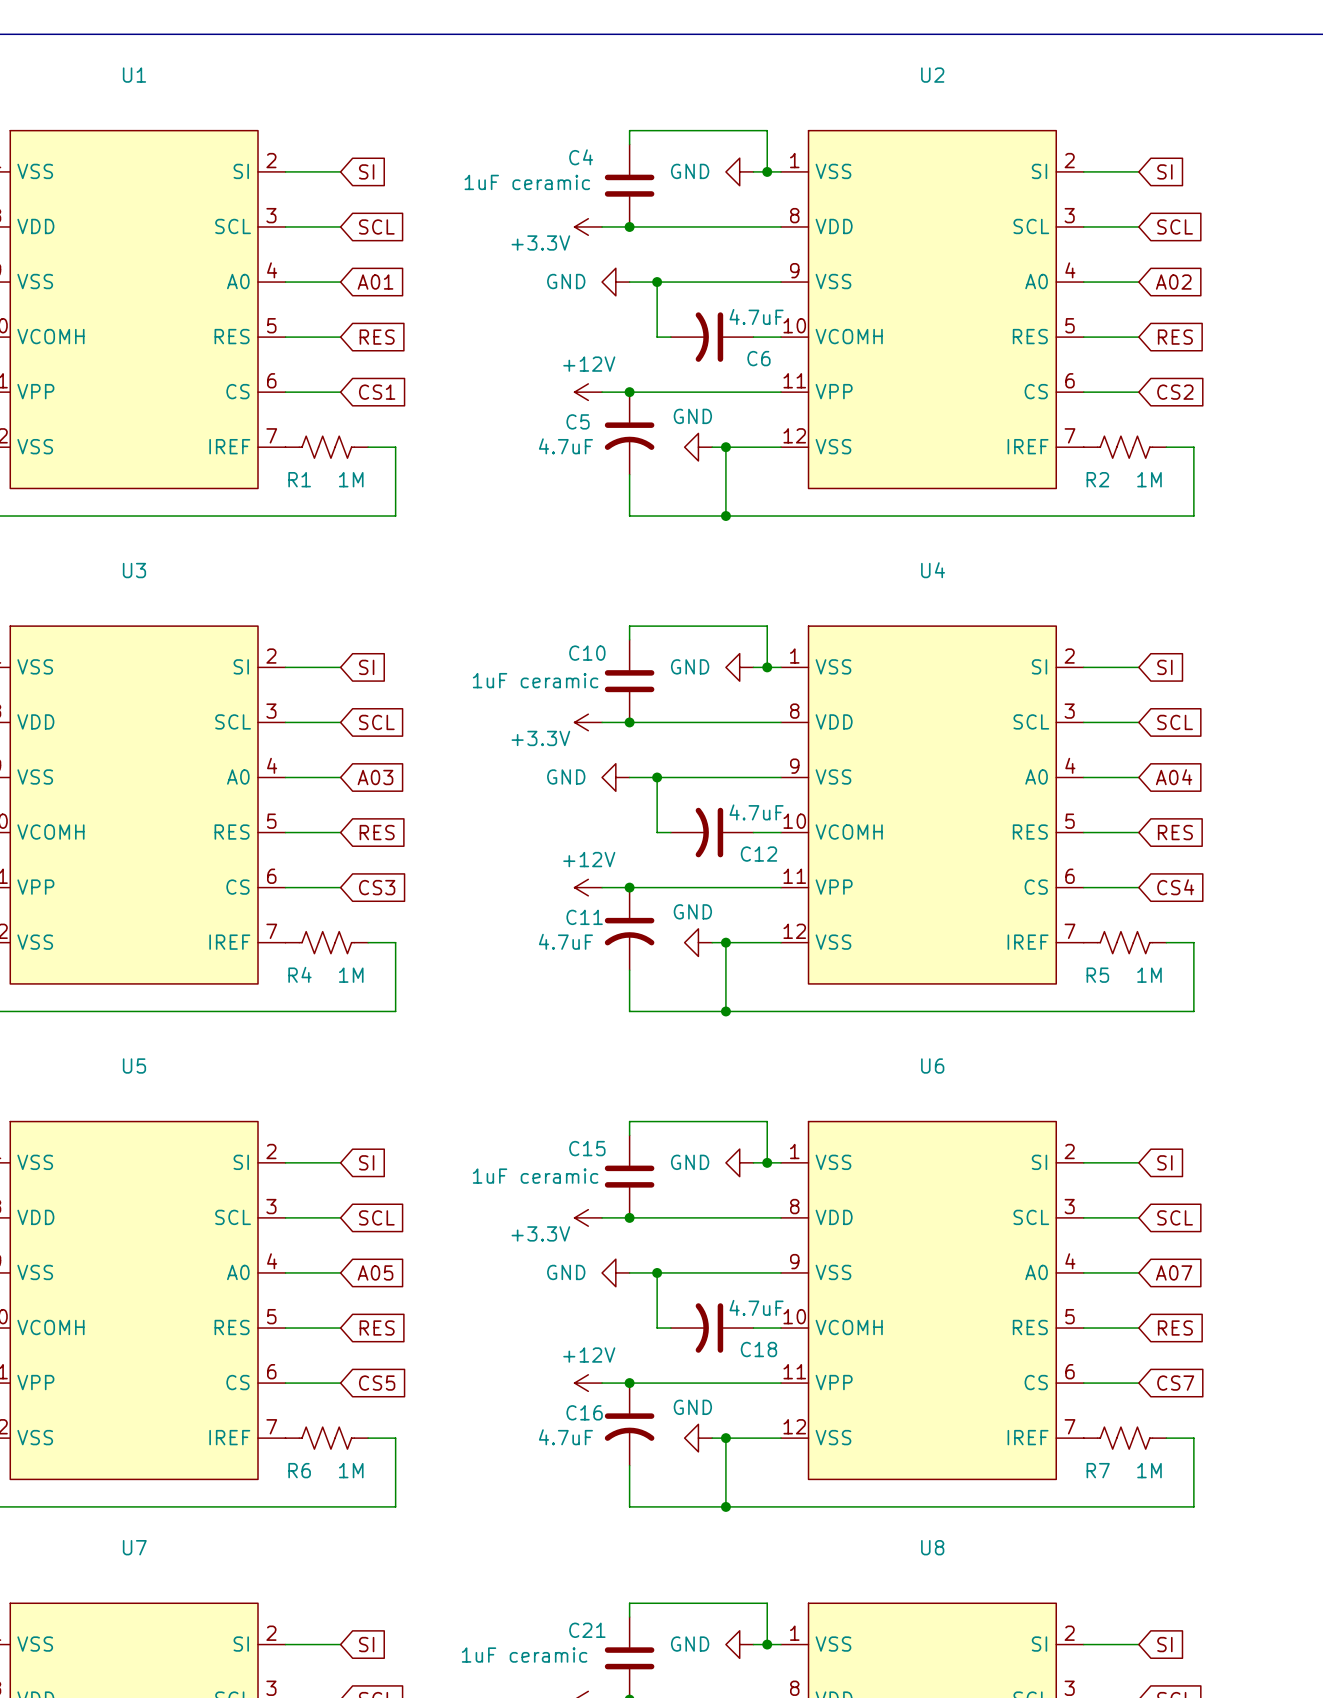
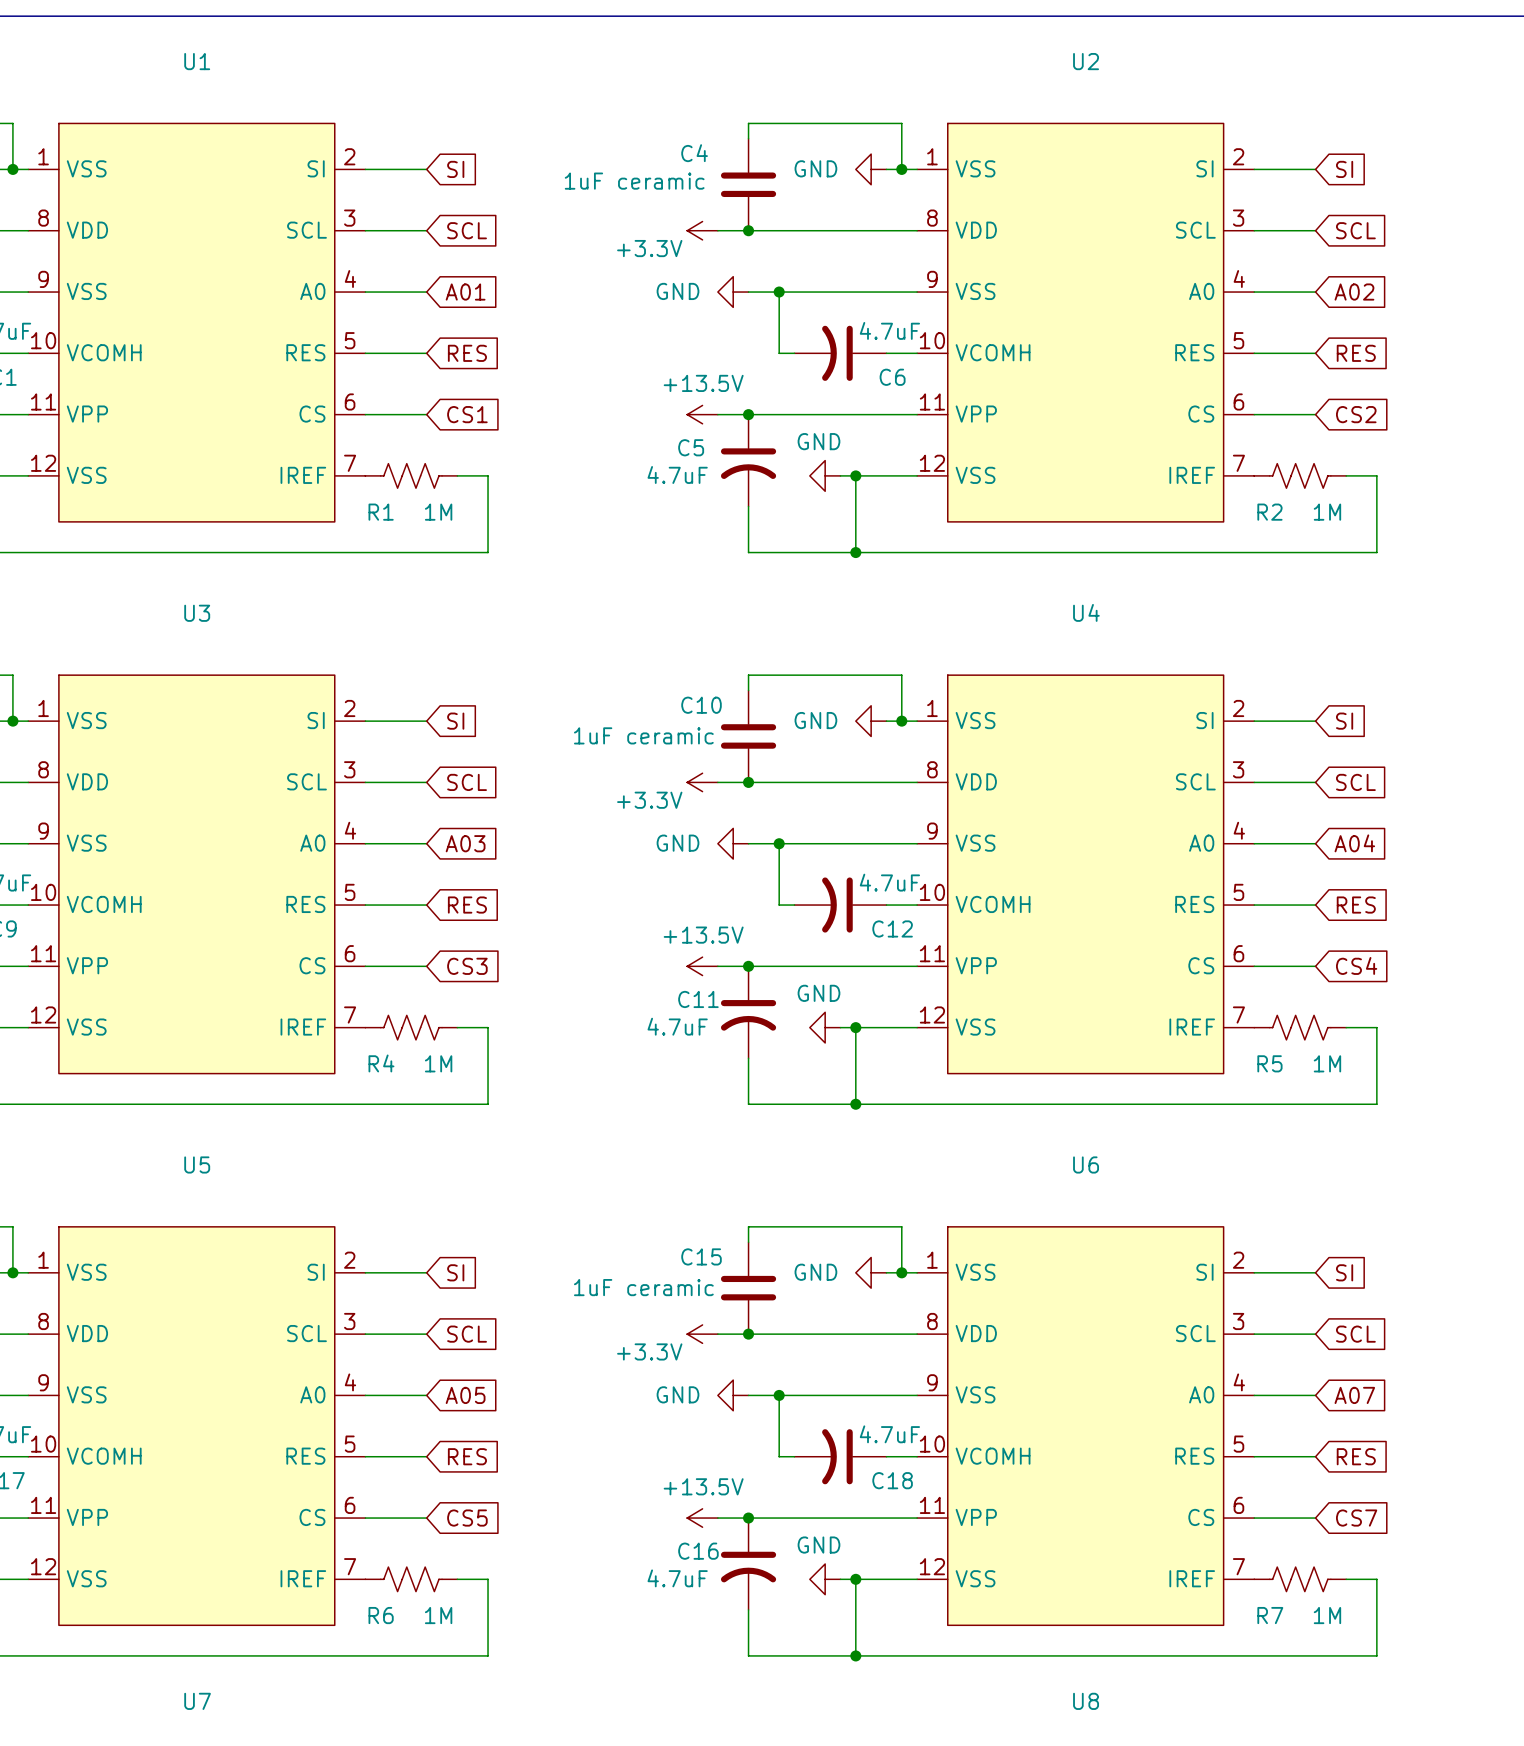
power symbol: +12V (588, 392) -> +13.5V (702, 414)
power symbol: +12V (588, 887) -> +13.5V (702, 966)
power symbol: +12V (588, 1383) -> +13.5V (702, 1518)

